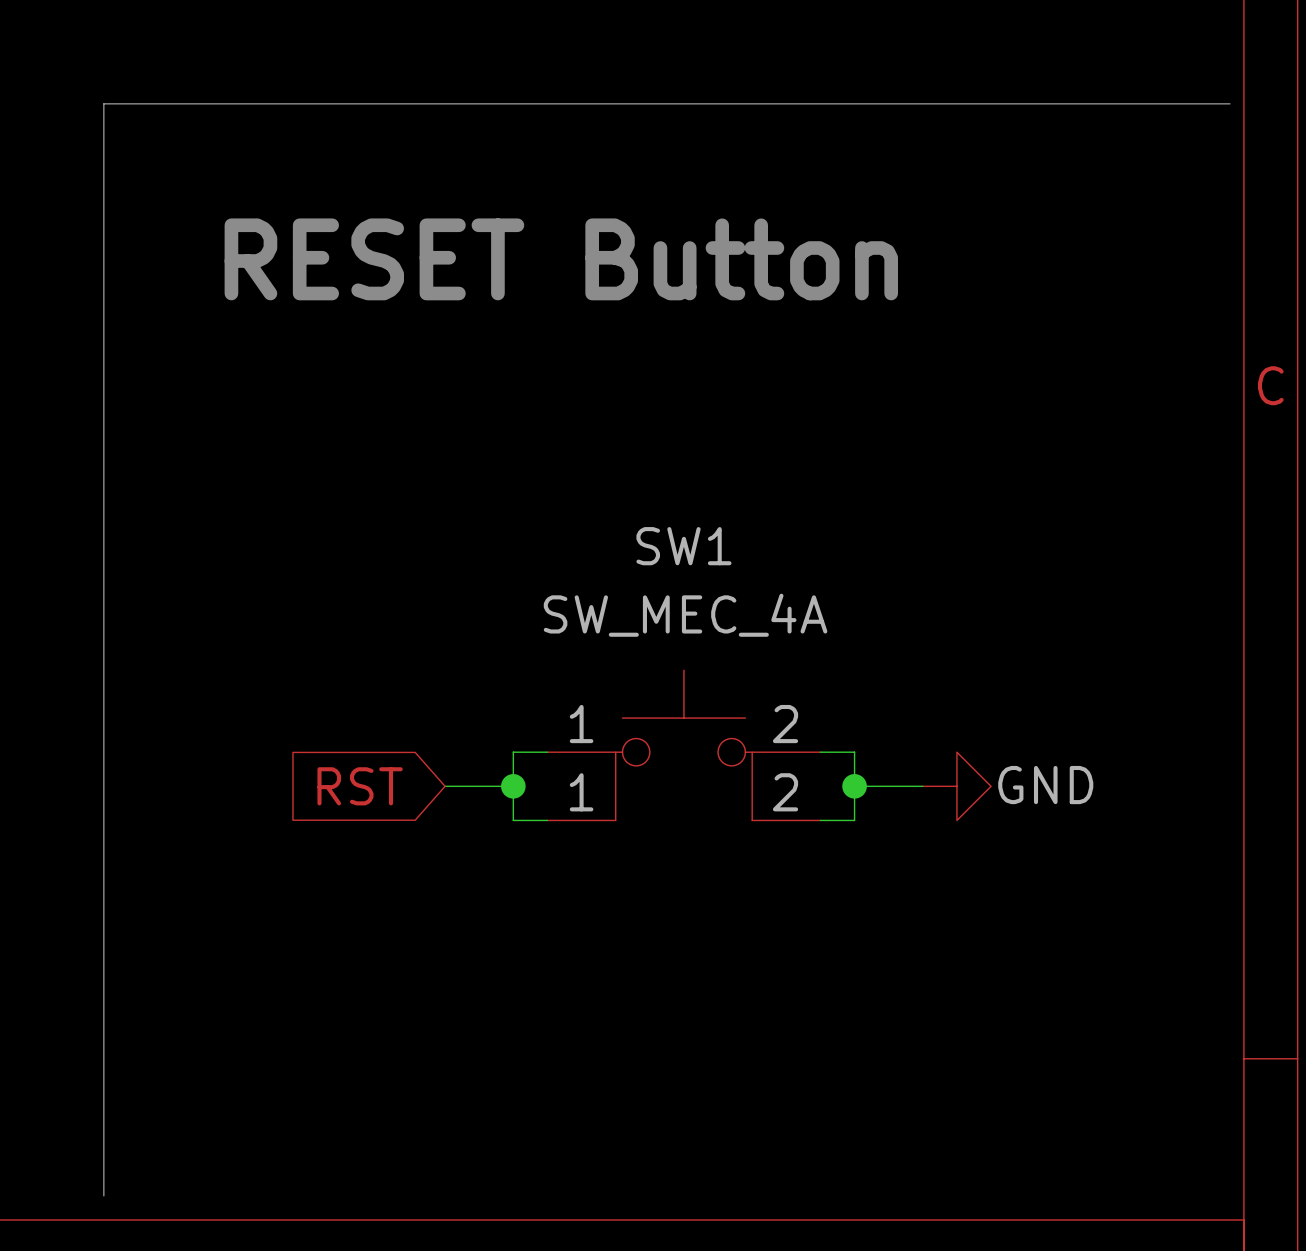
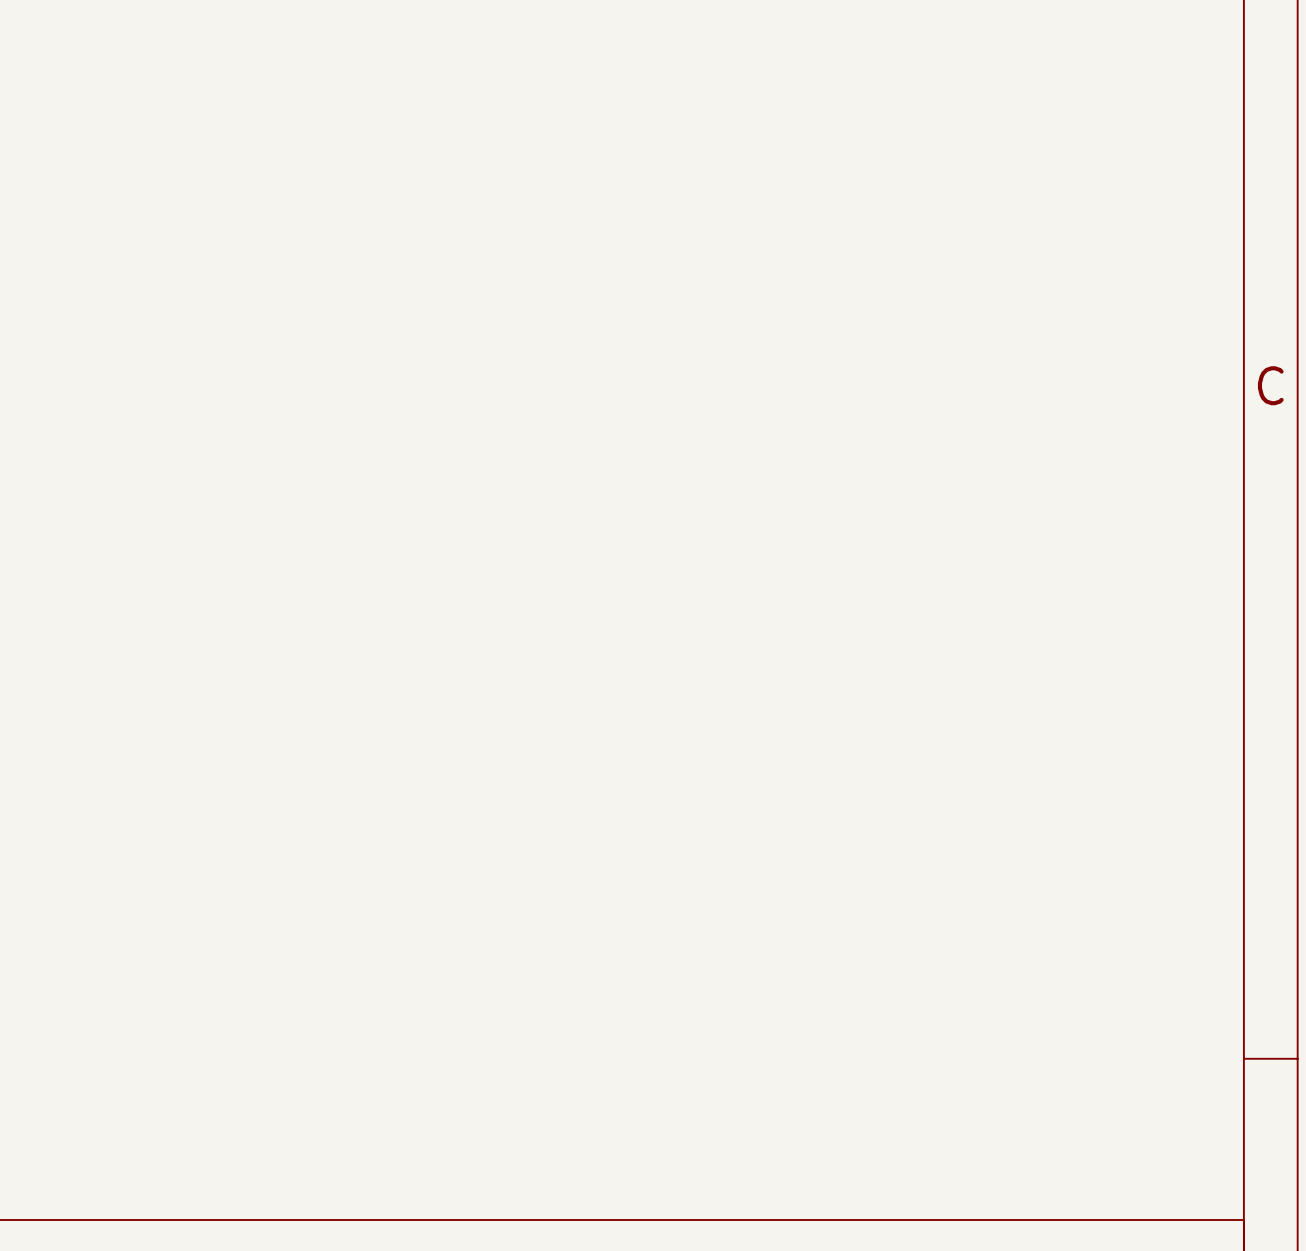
line: (1229, 103) (103, 103) (103, 1195) -> none
text: RESET Button (561, 259) -> none
SW1: SW_MEC_4A (683, 745) -> none
wire: (547, 752) (513, 752) (513, 820) (547, 820) -> none
wire: (820, 752) (854, 752) (854, 820) (820, 820) -> none
global label: RST (360, 786) -> none
wire: (445, 786) (513, 786) -> none
junction: (513, 786) -> none
wire: (854, 786) (922, 786) -> none
junction: (854, 786) -> none
power symbol: GND (956, 786) -> none

